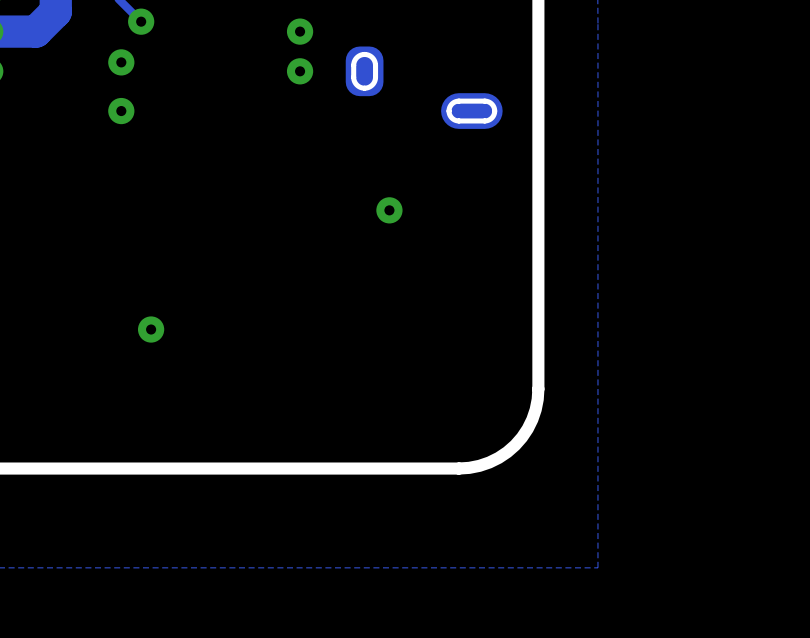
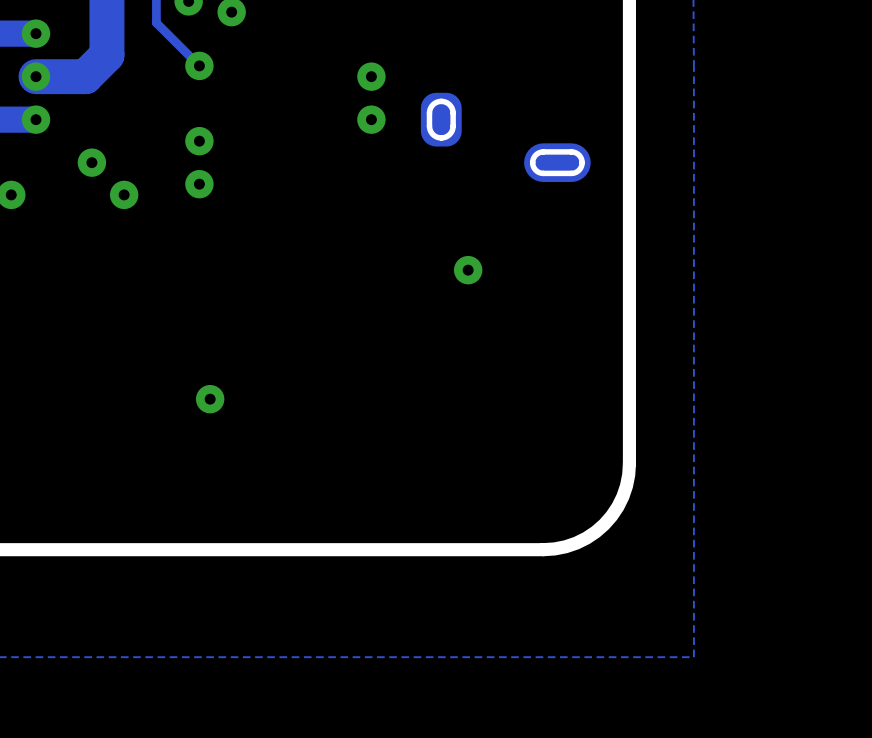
via: (121, 62) -> none
via: none -> (199, 141)
via: none -> (91, 162)
via: (121, 111) -> none
via: none -> (199, 184)
via: none -> (124, 194)

